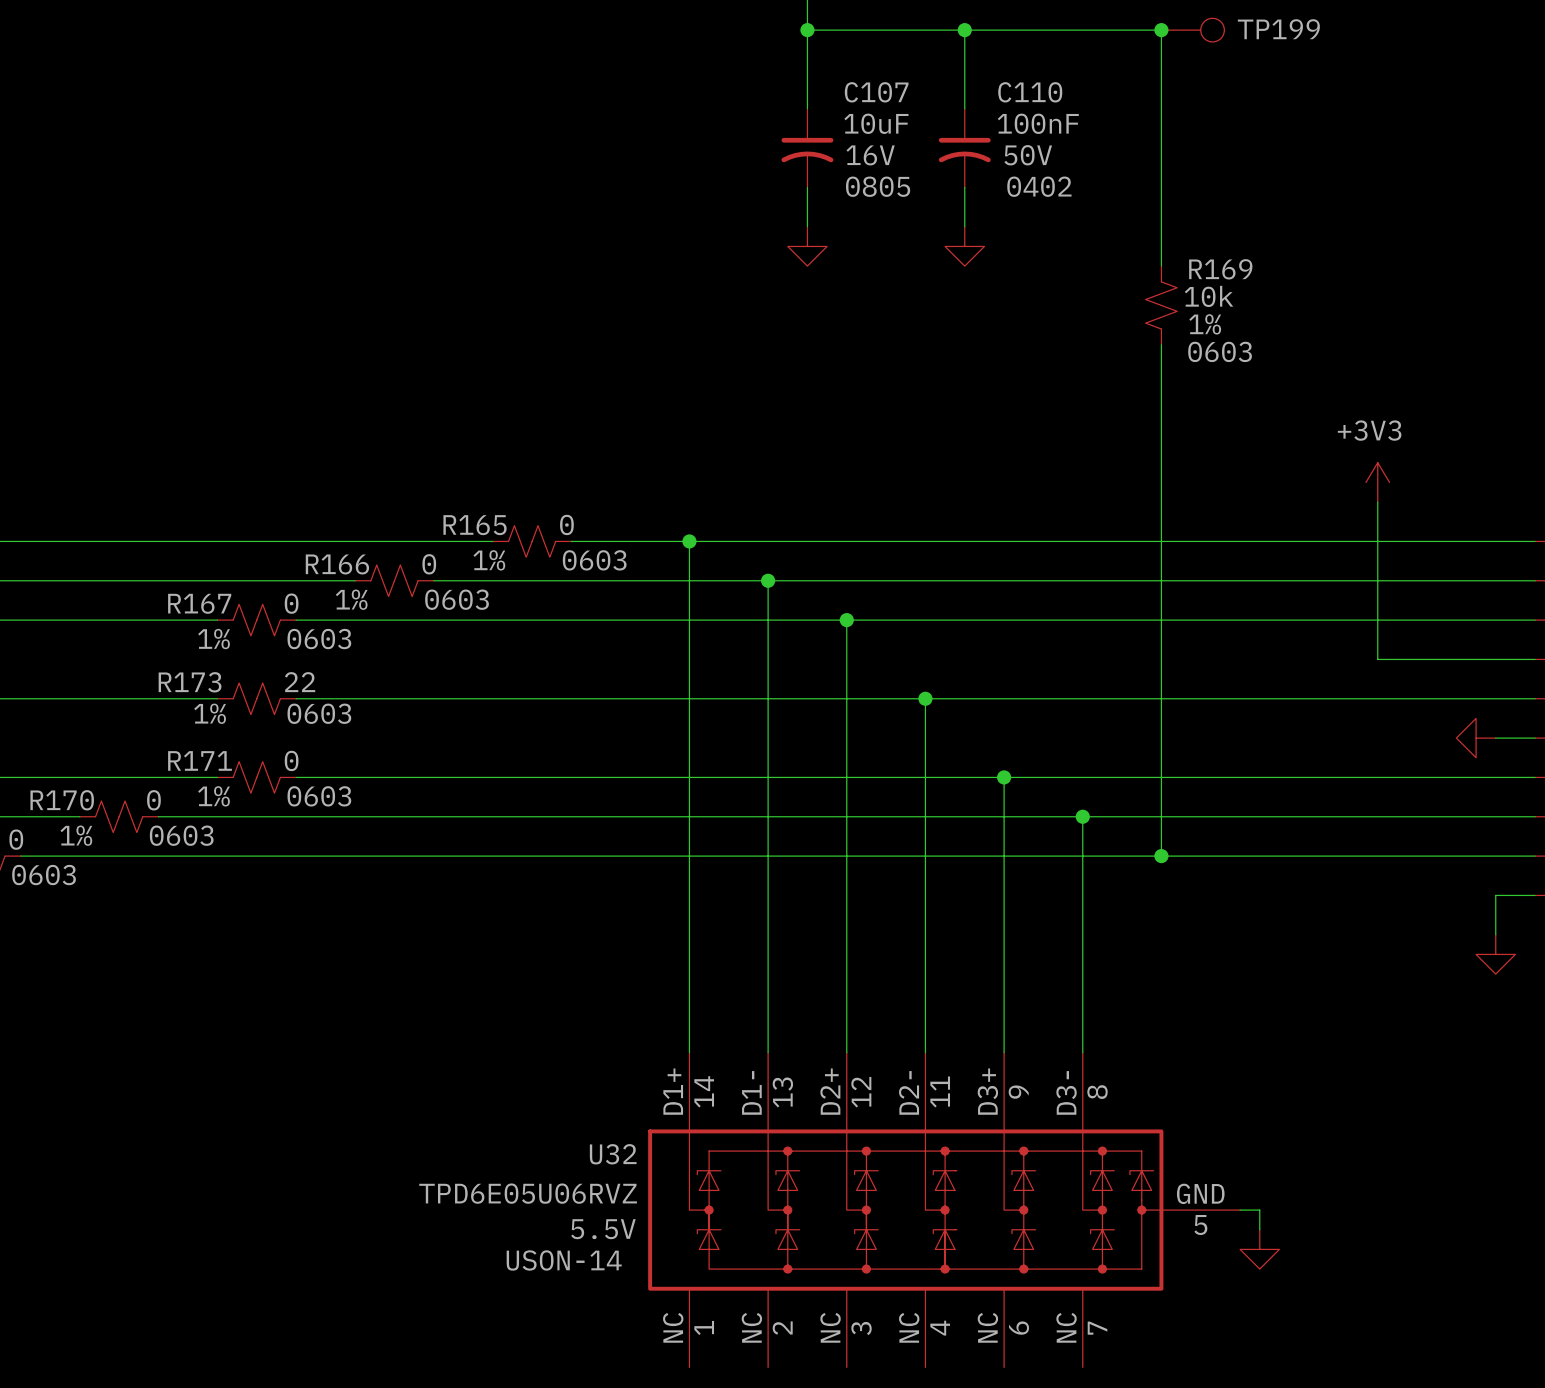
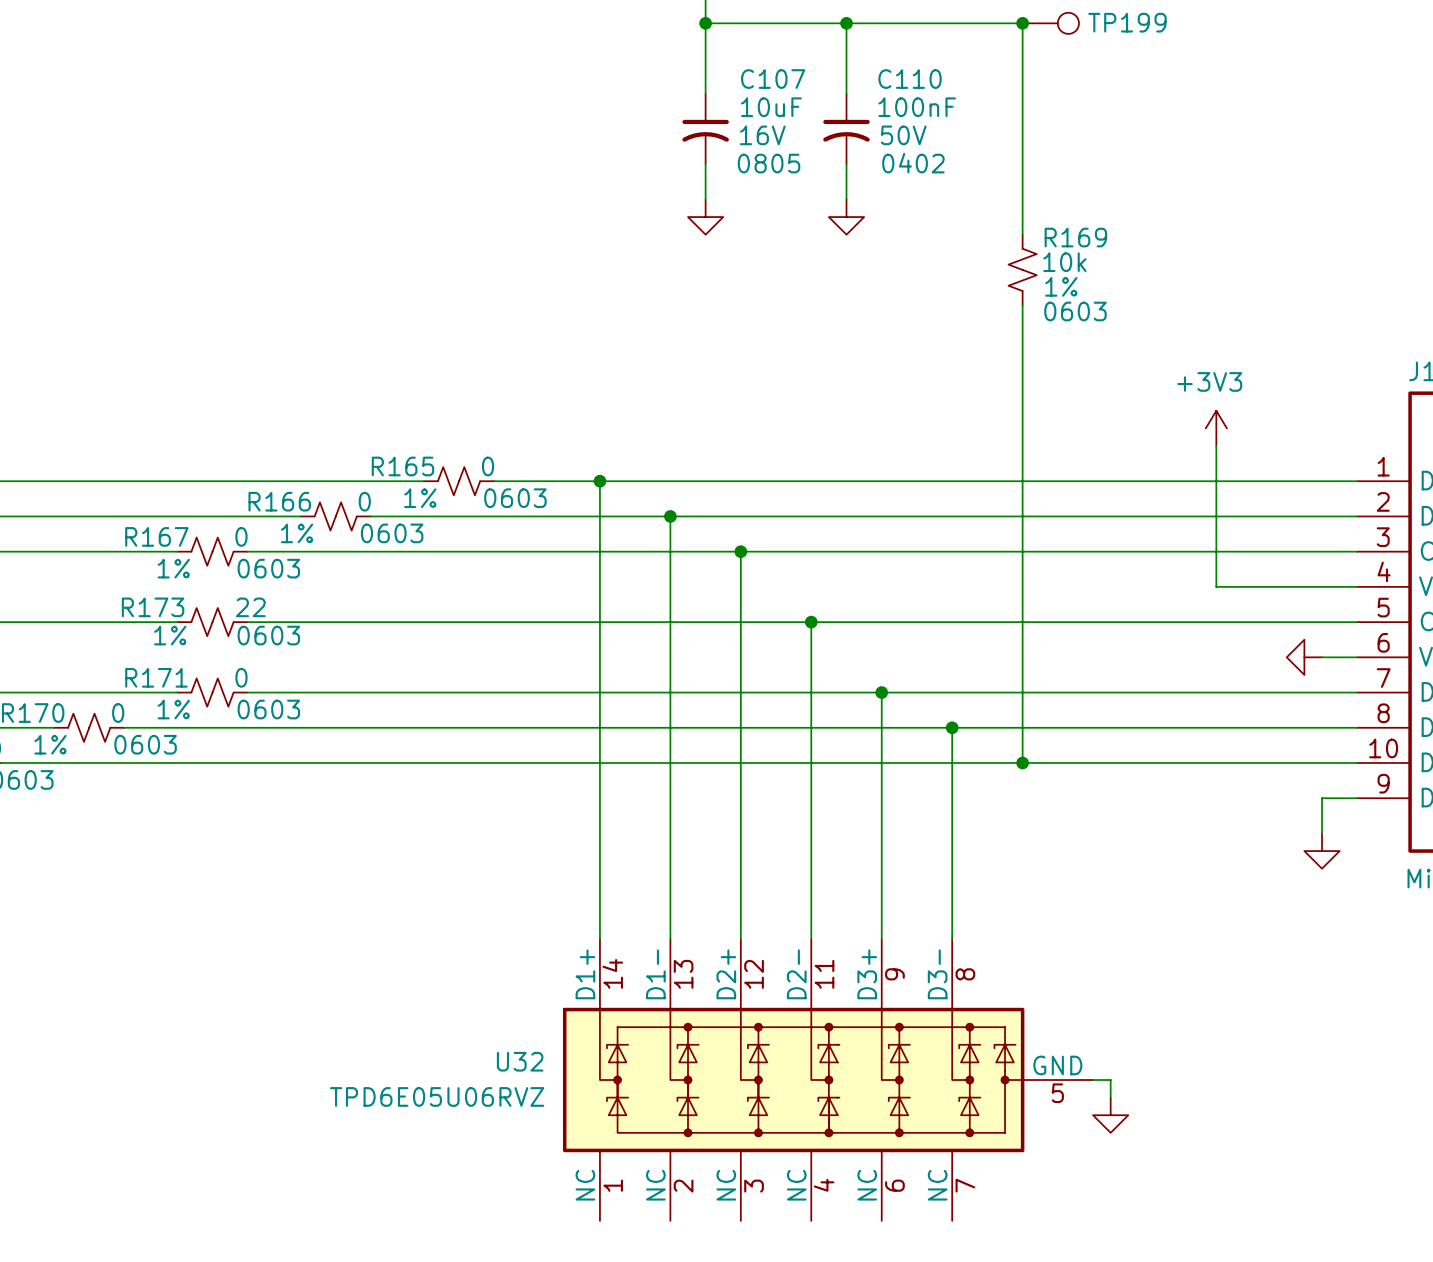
U32 name position: U32 (613, 1154) -> U32 (520, 1061)
U32 value position: TPD6E05U06RVZ (528, 1193) -> TPD6E05U06RVZ (437, 1096)
U32 text: 5.5V (603, 1229) -> none
U32 text: USON-14 (564, 1260) -> none

